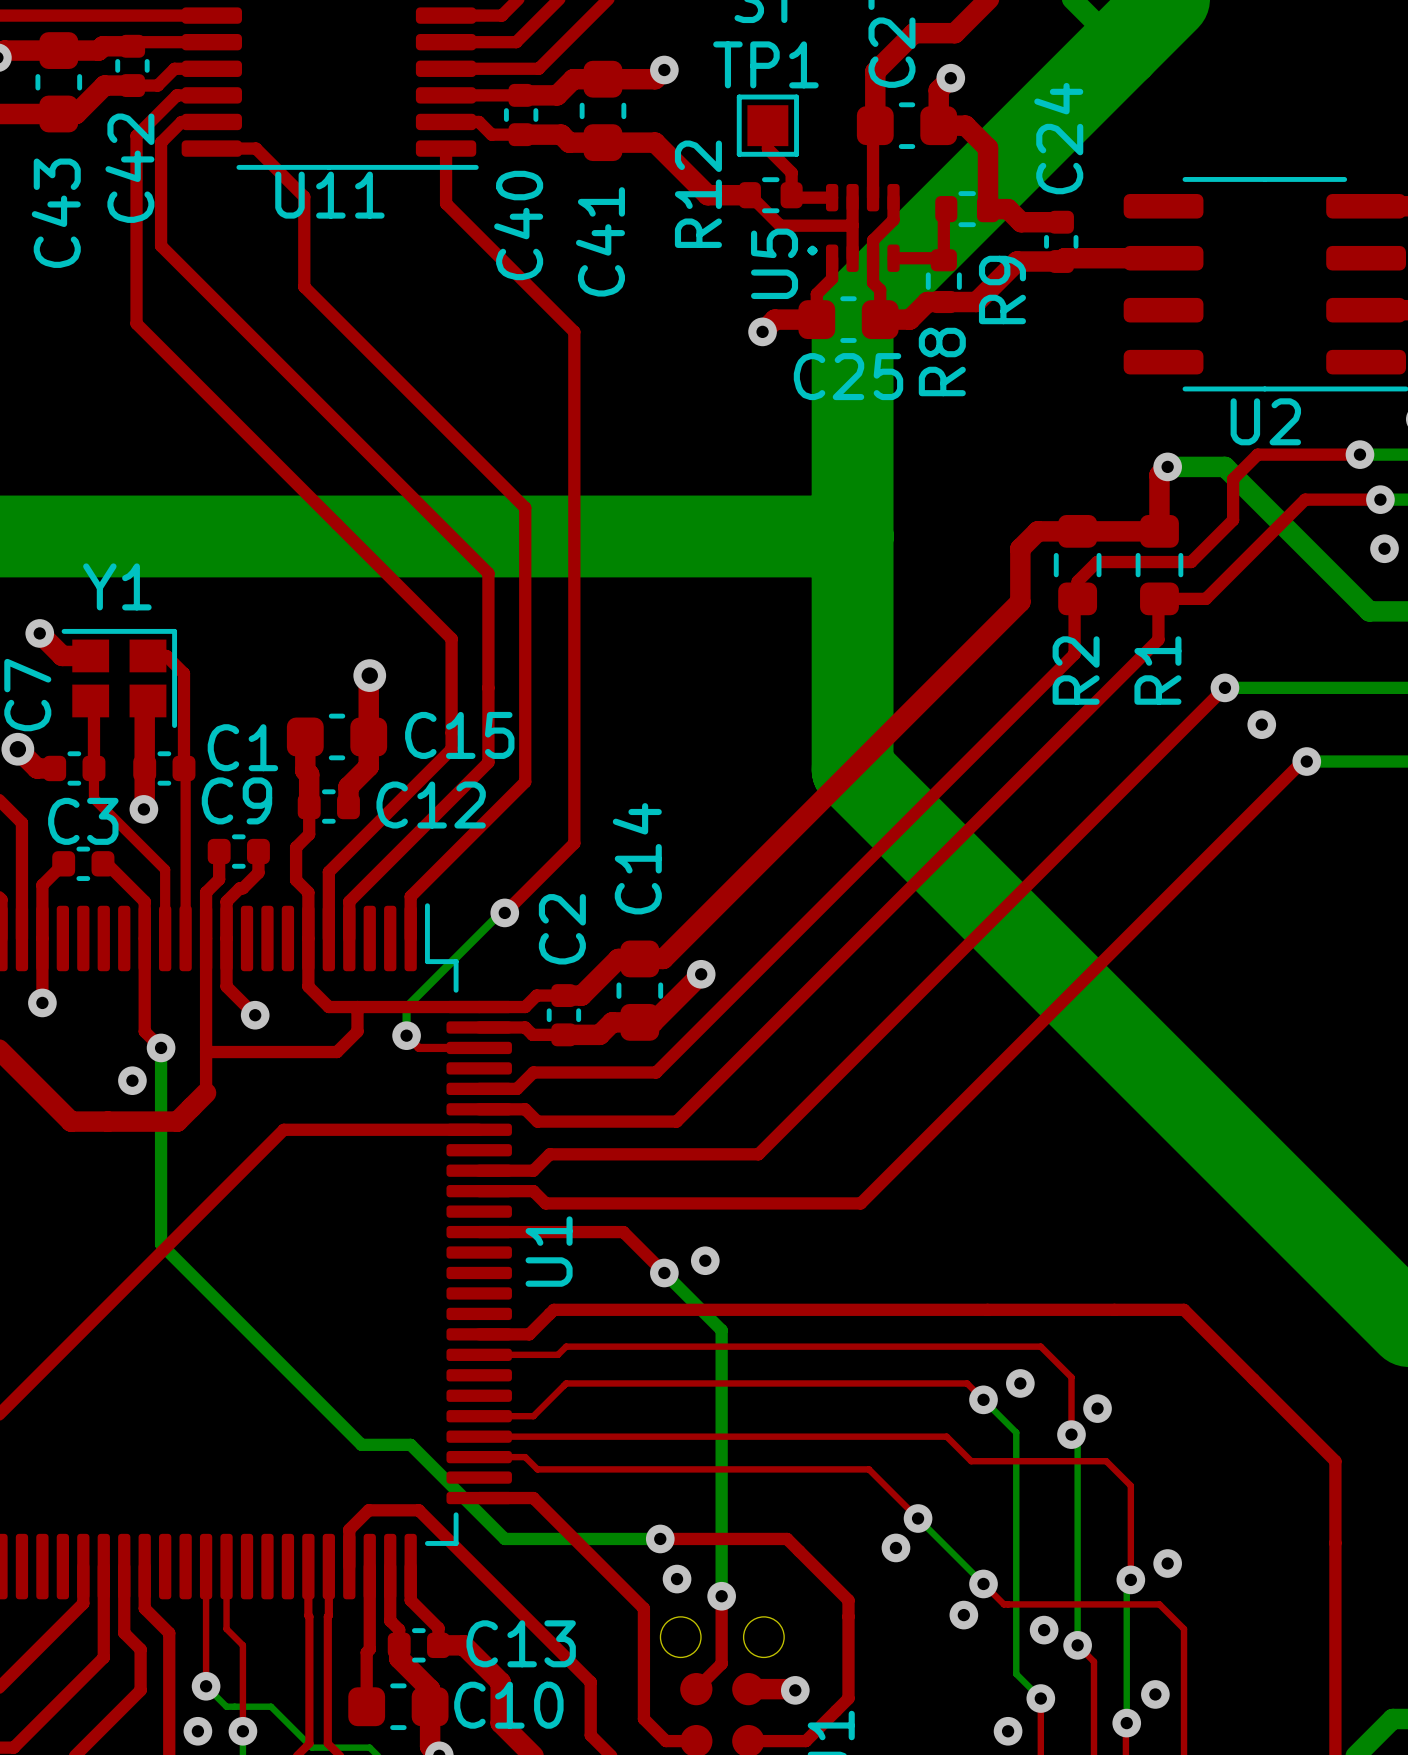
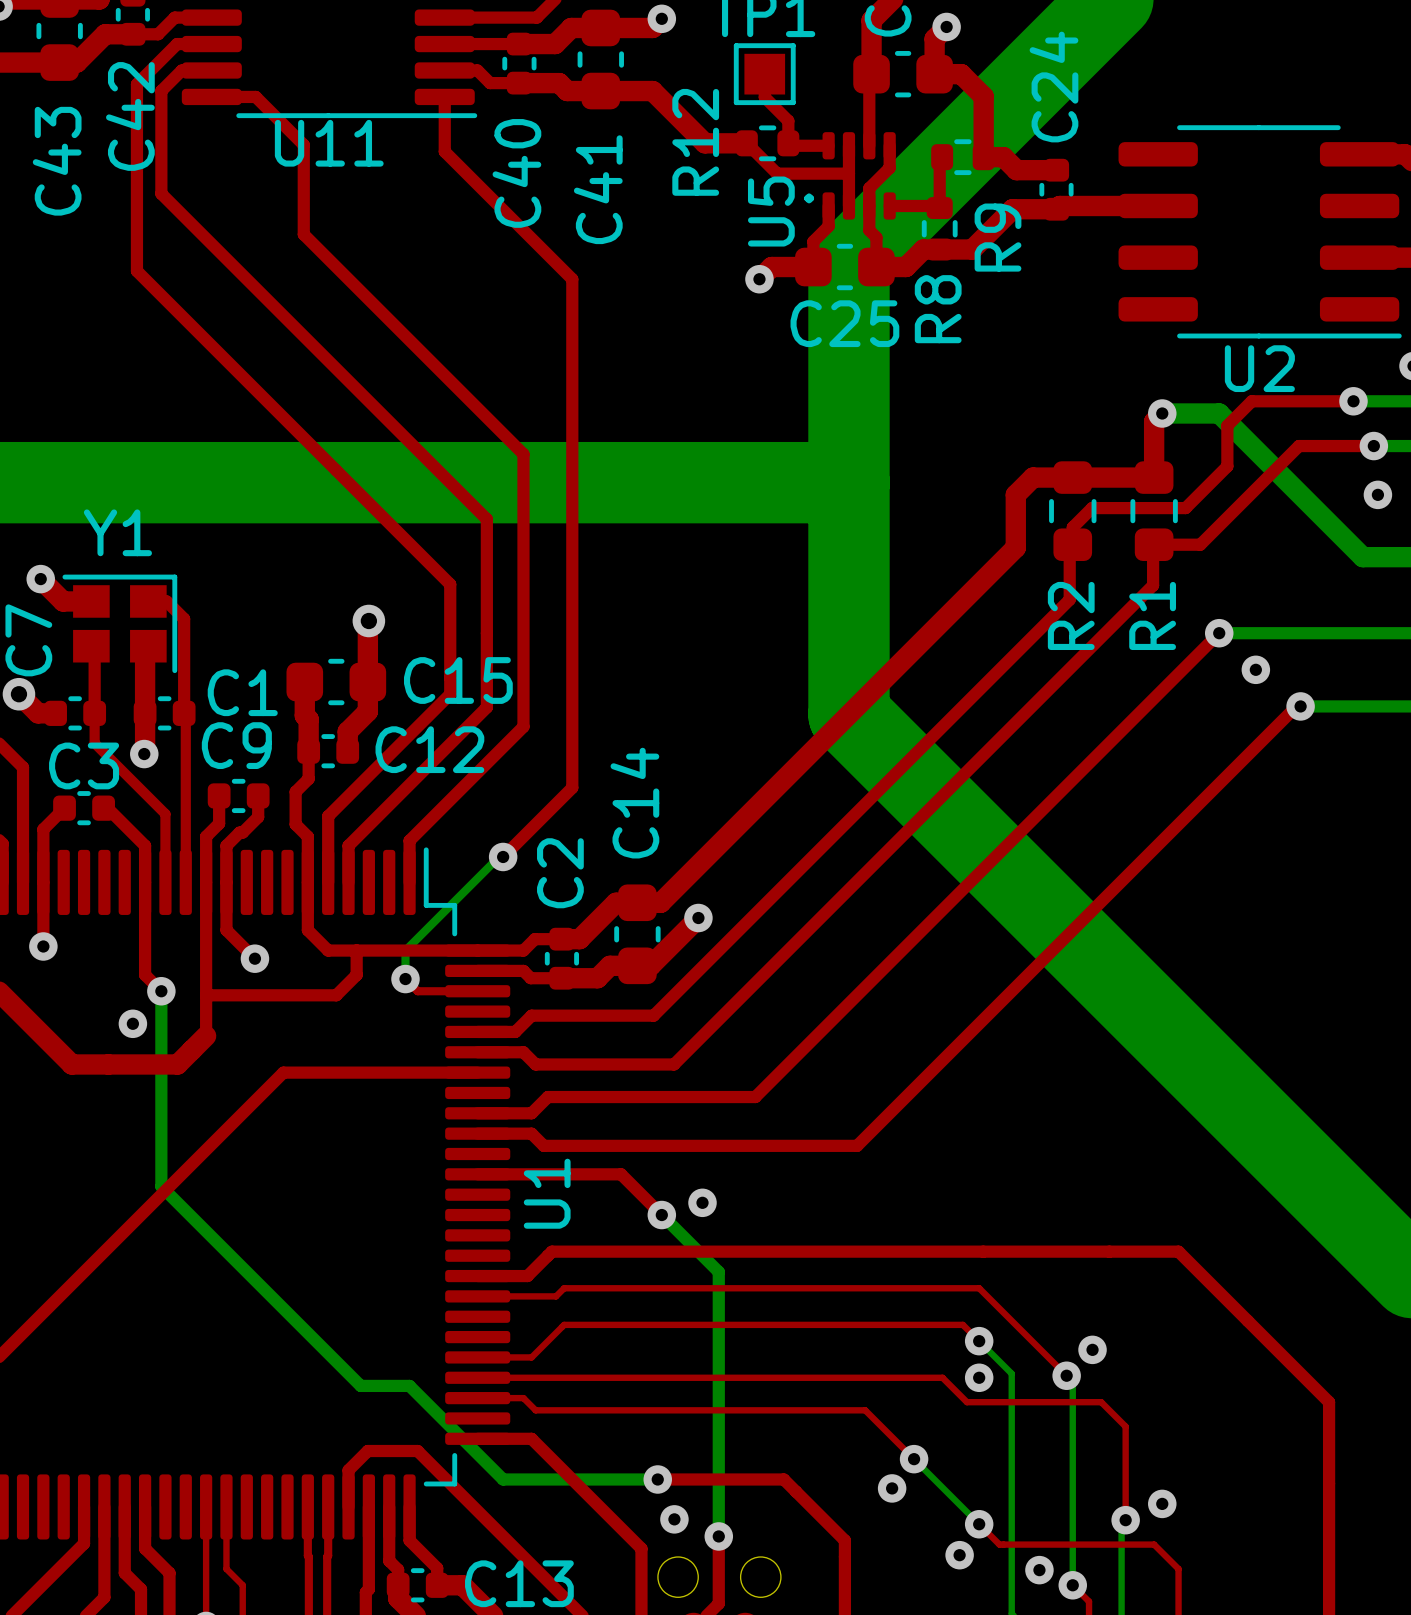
top track: (983, 1346) (1040, 1346) (1071, 1377) (1071, 1434) -> (979, 1288) (1066, 1375)
via position: (1020, 1383) -> (979, 1377)

